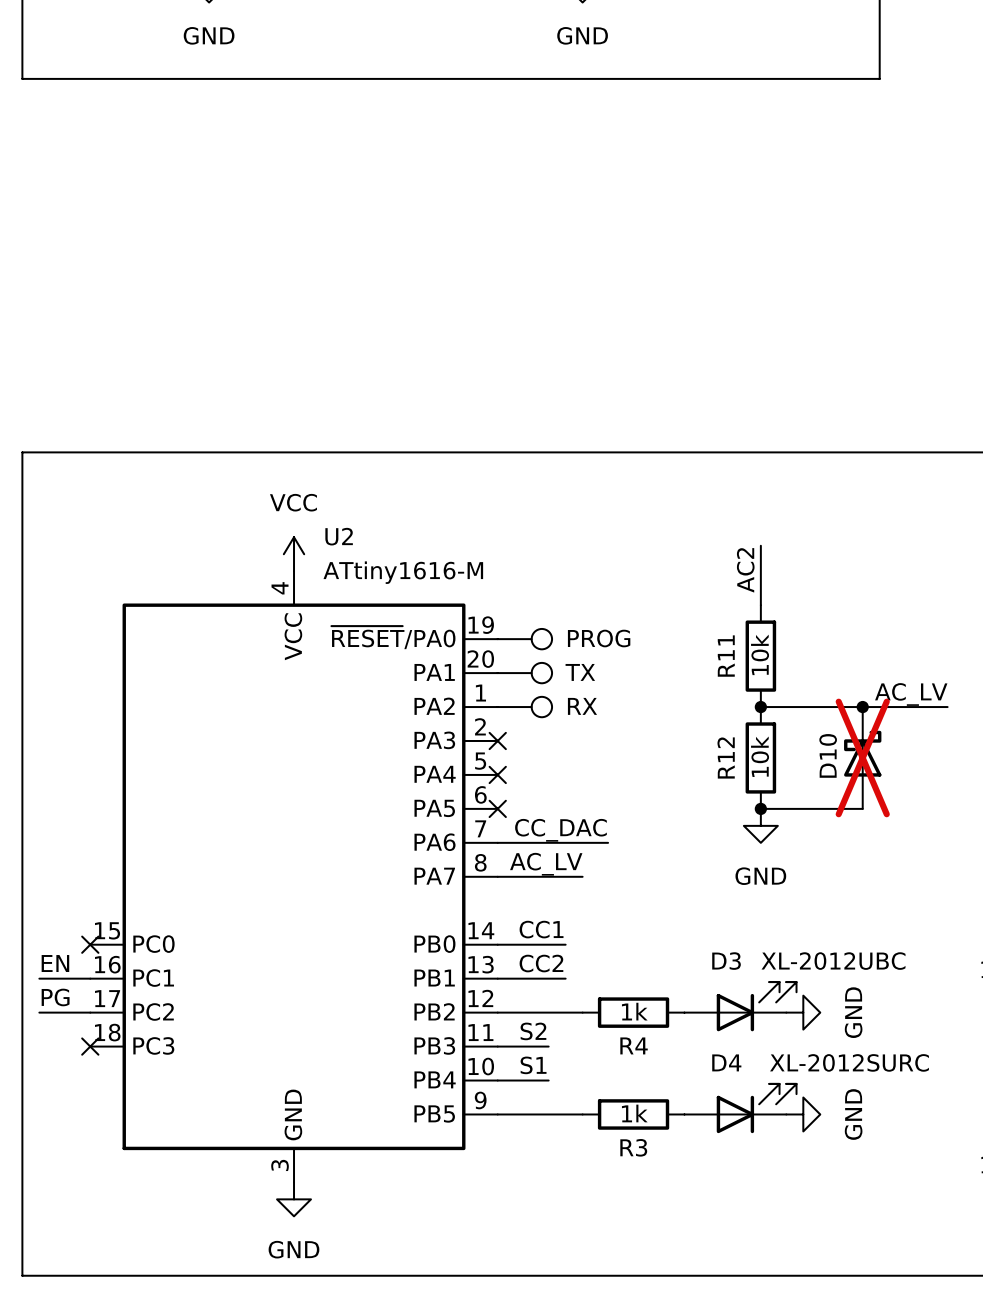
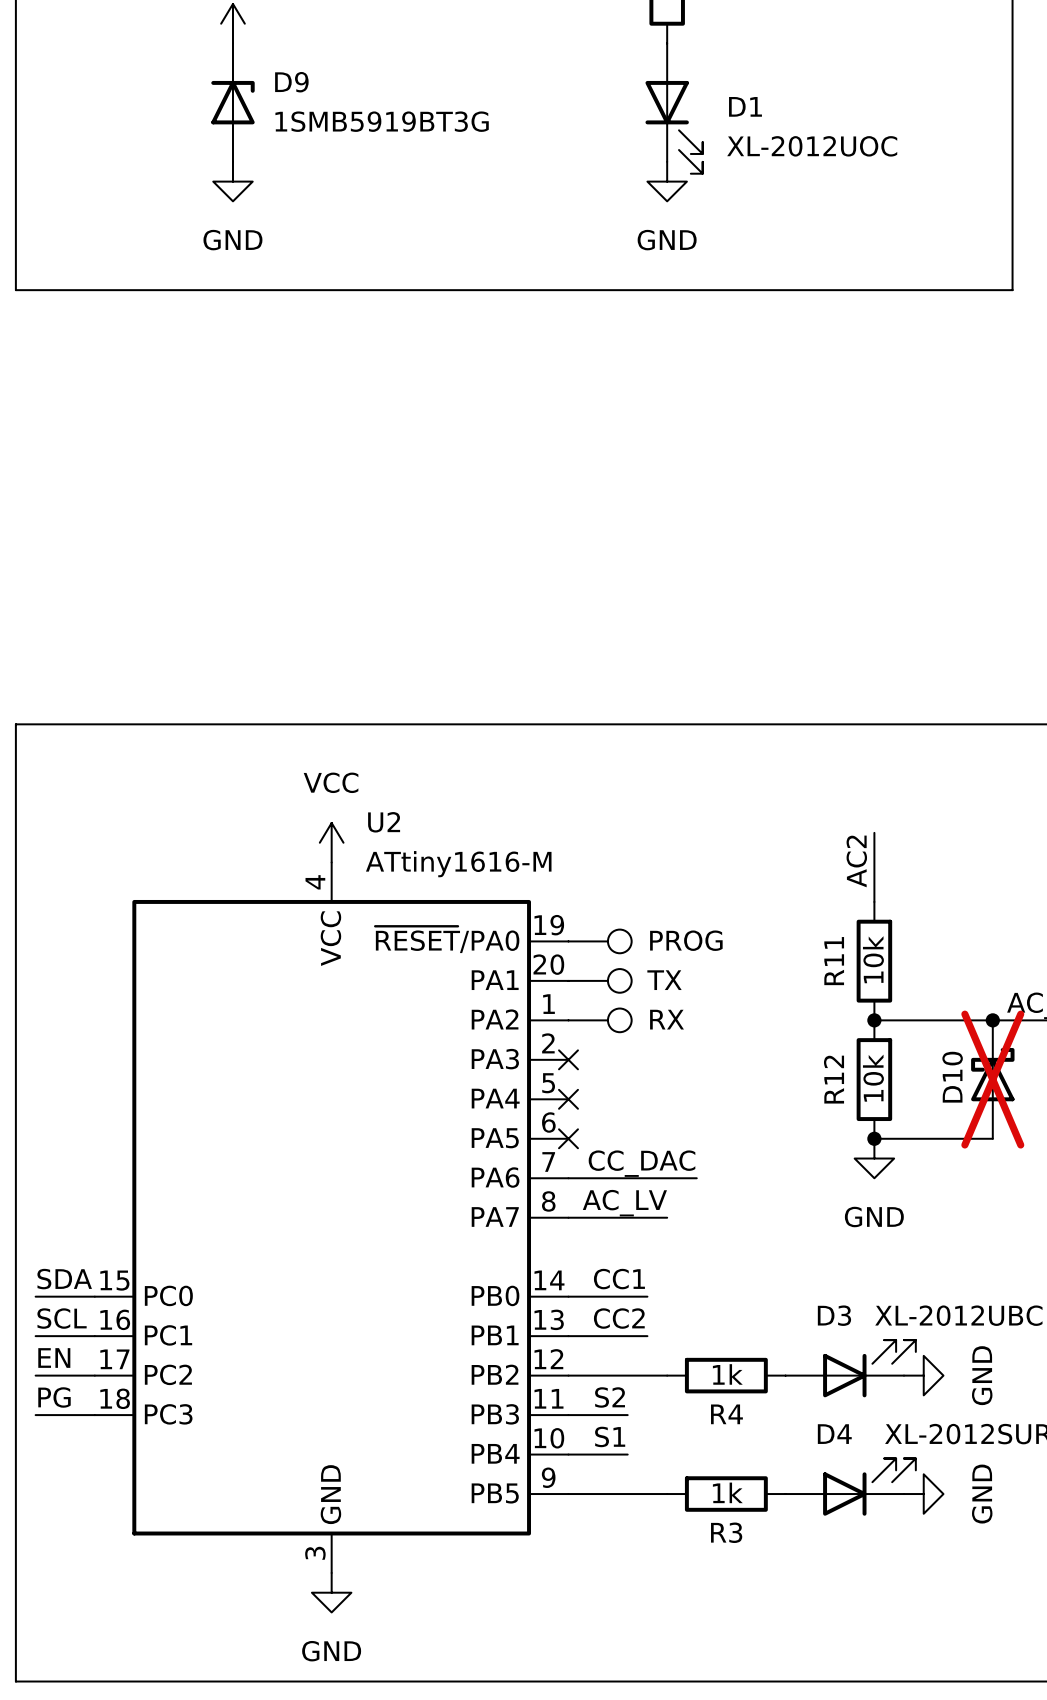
label: none -> SDA (64, 1279)
wire: none -> (35, 1296) (94, 1296)
no-connect mark: (90, 944) -> none
label: EN (55, 963) -> SCL (62, 1318)
label: PG (55, 997) -> EN (54, 1358)
label: none -> PG (54, 1397)
wire: none -> (35, 1415) (94, 1415)
no-connect mark: (90, 1046) -> none

